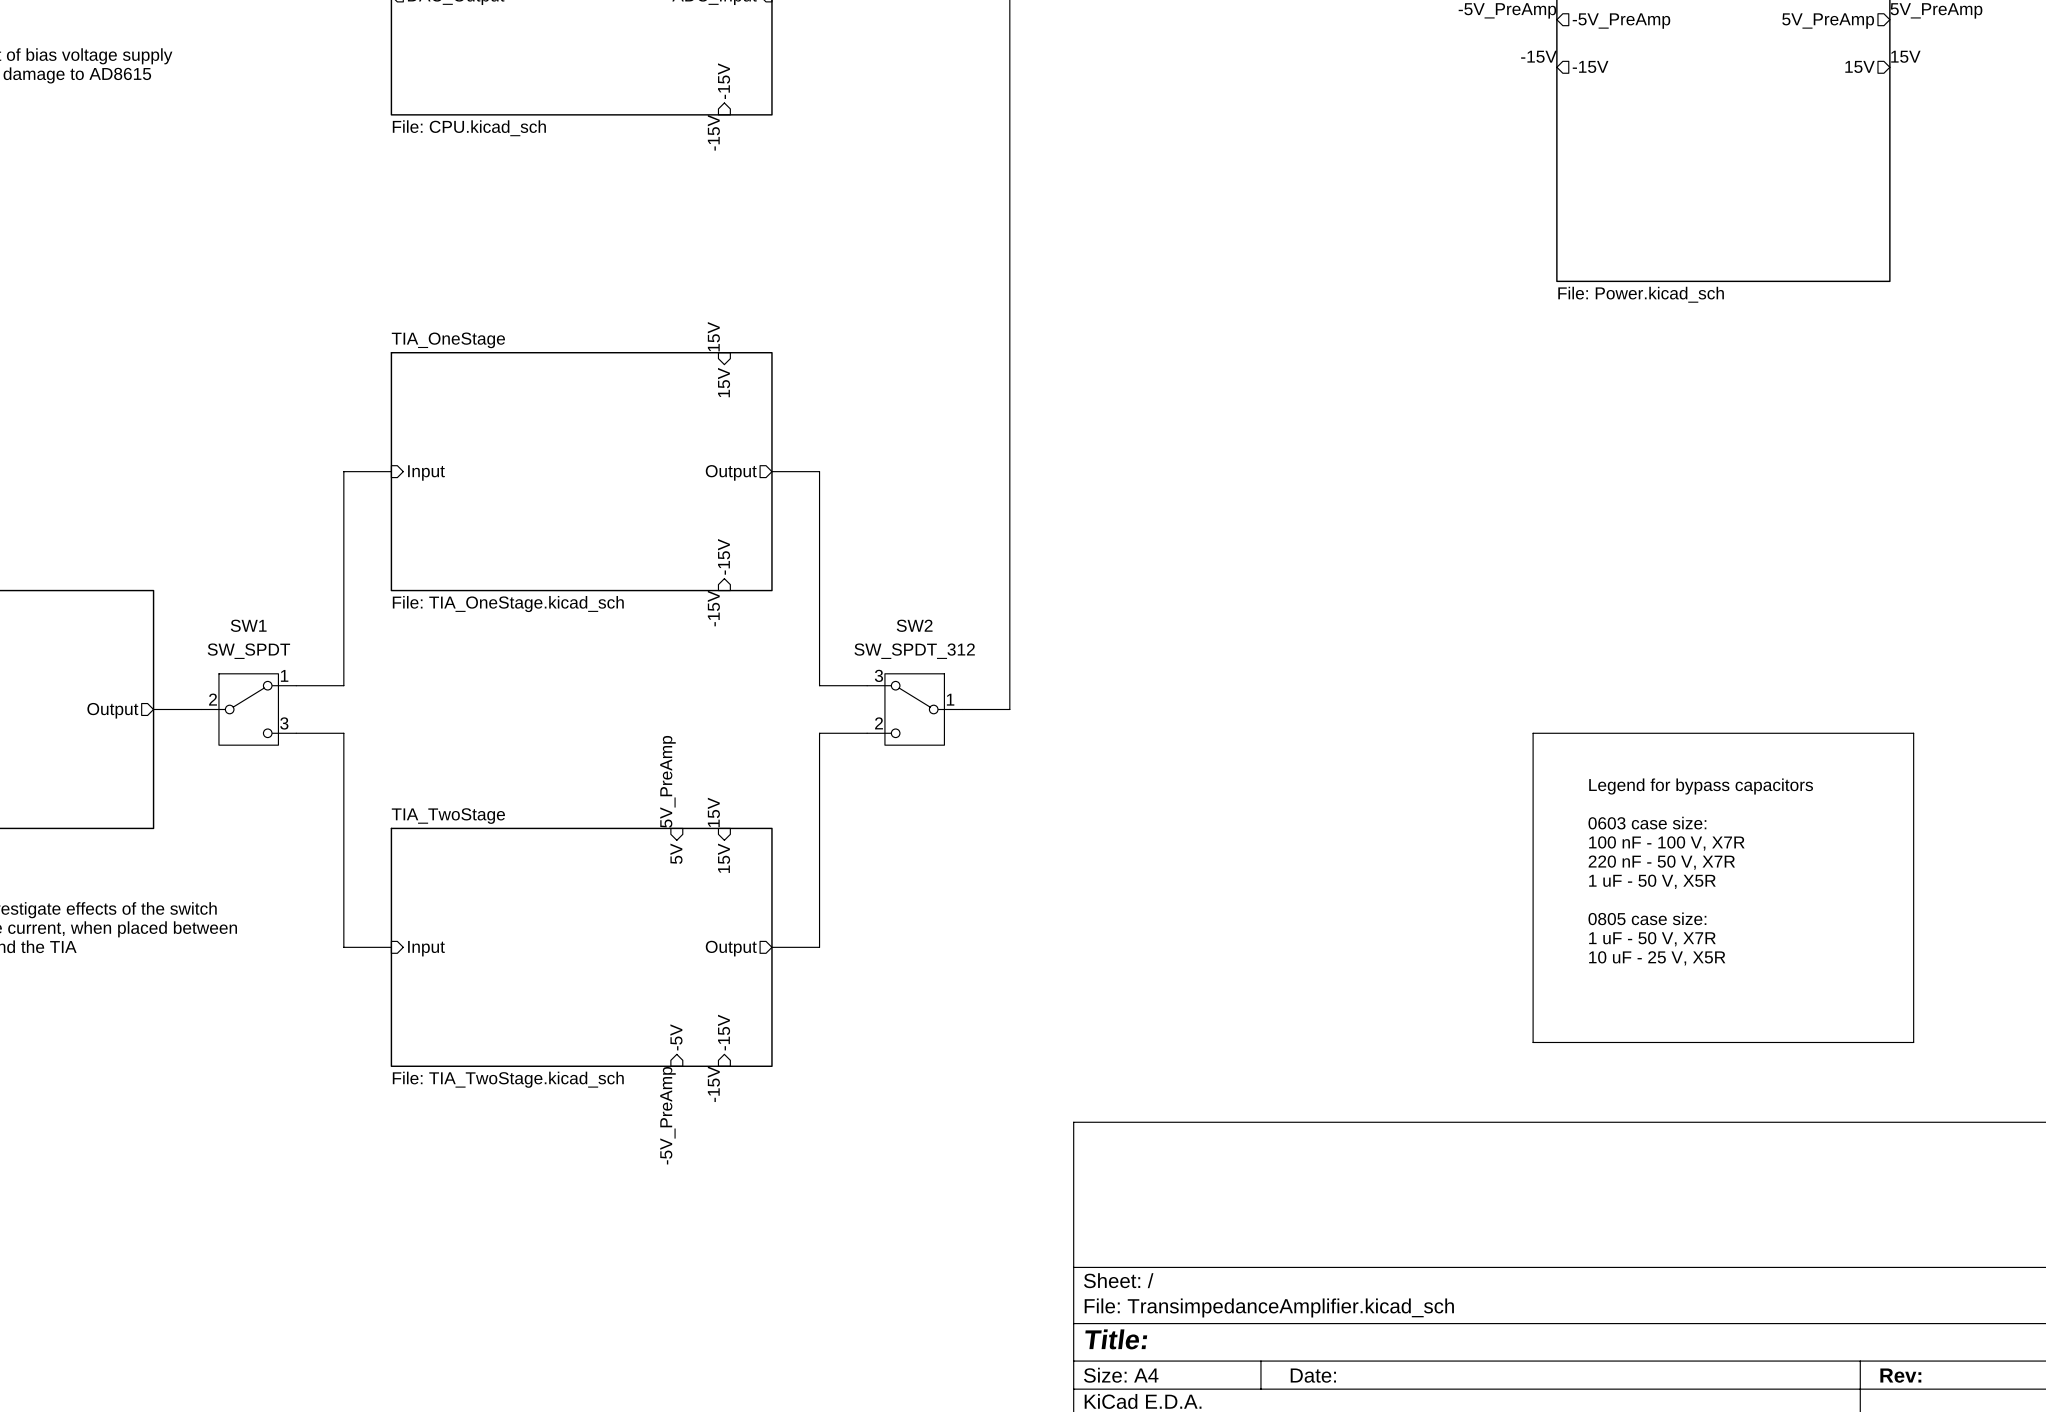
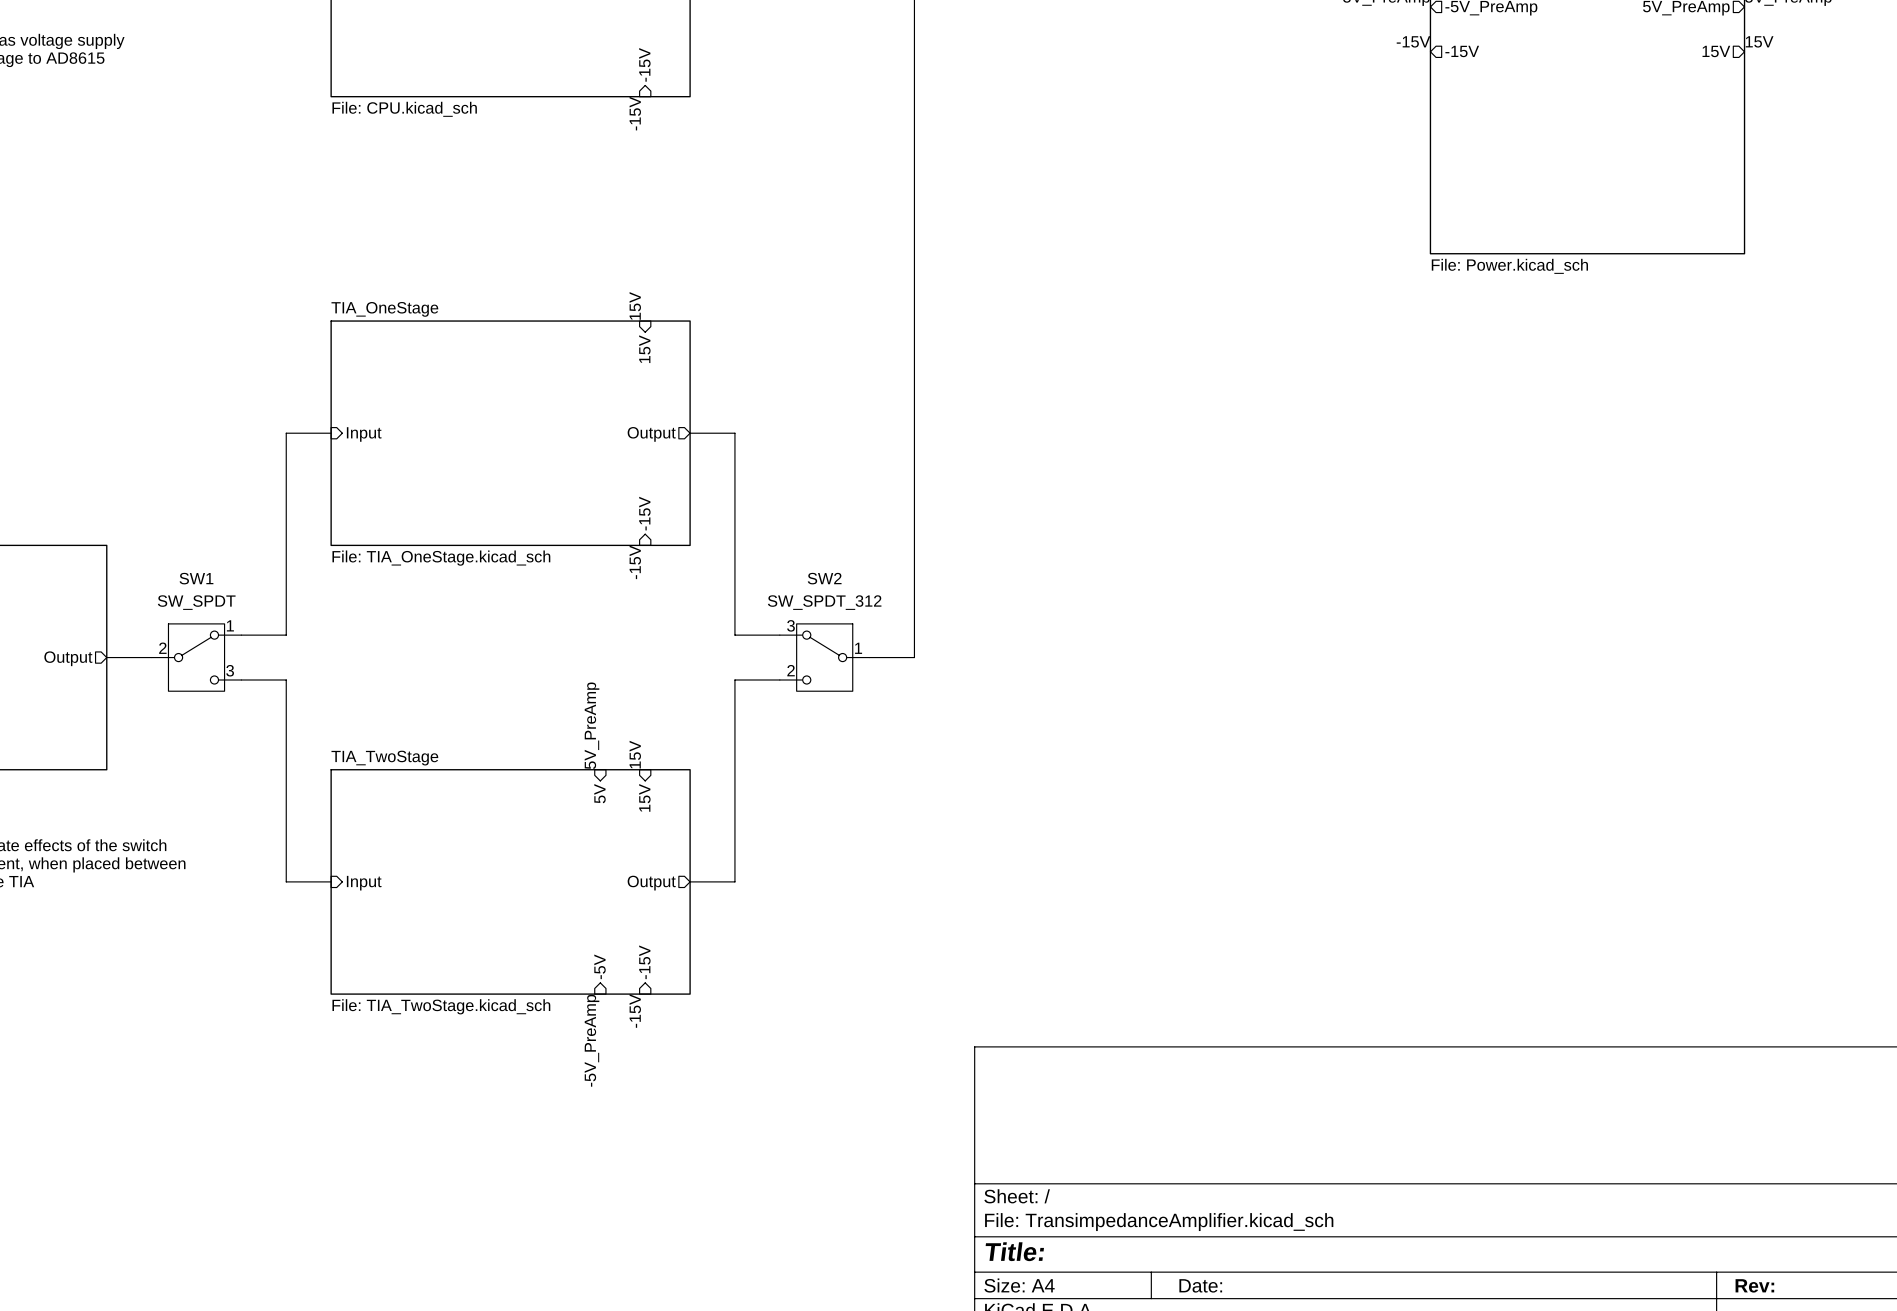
line: (1533, 733) (1913, 733) (1913, 1042) (1533, 1042) (1533, 733) -> none
text: Legend for bypass capacitors (1701, 786) -> none
text: 0603 case size: (1647, 823) -> none
text: 100 nF - 100 V, X7R (1666, 843) -> none
text: 220 nF - 50 V, X7R (1661, 862) -> none
text: 1 uF - 50 V, X5R (1652, 881) -> none
text: 0805 case size: (1647, 918) -> none
text: 1 uF - 50 V, X7R (1652, 939) -> none
text: 10 uF - 25 V, X5R (1657, 958) -> none

